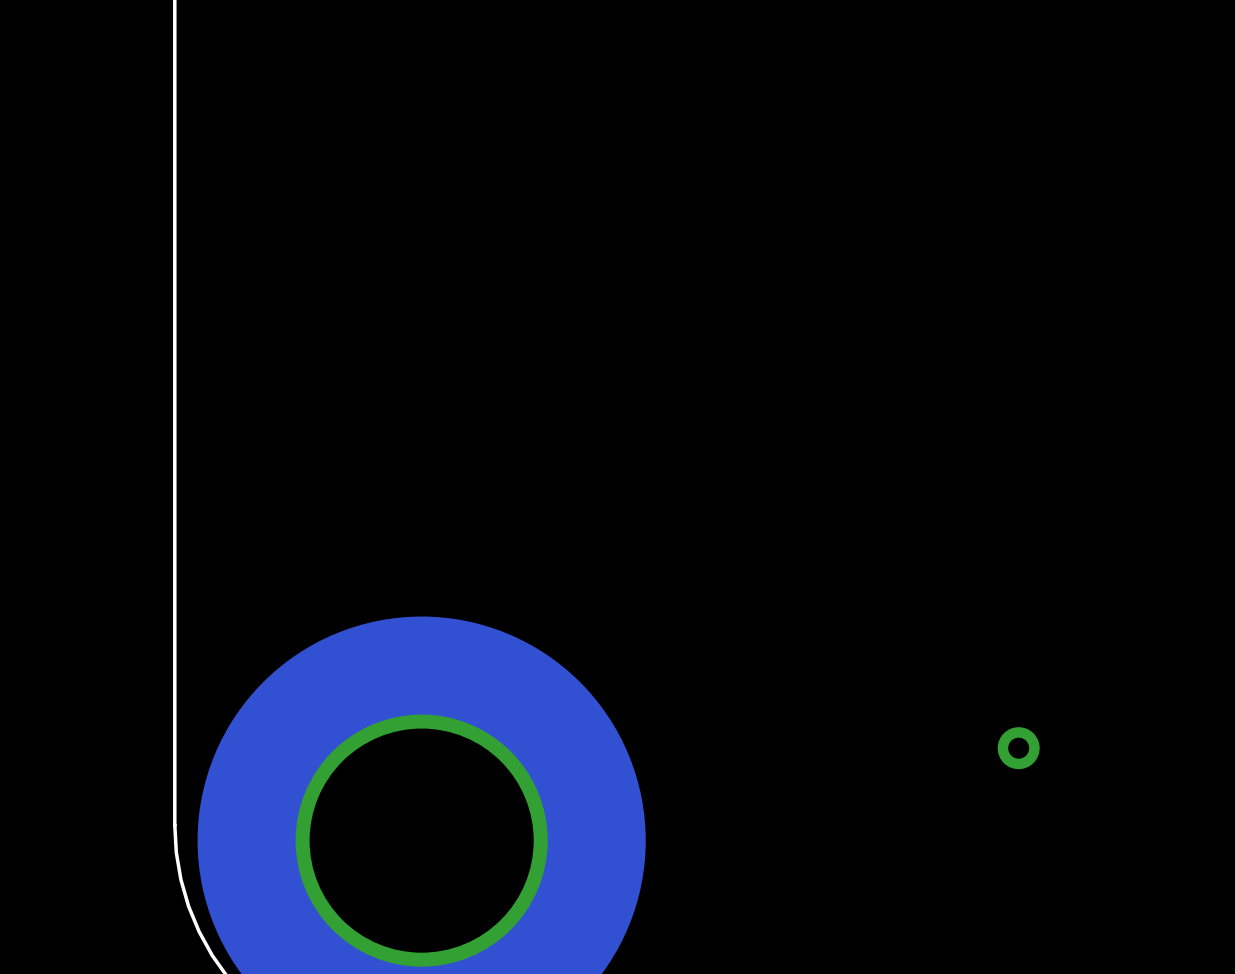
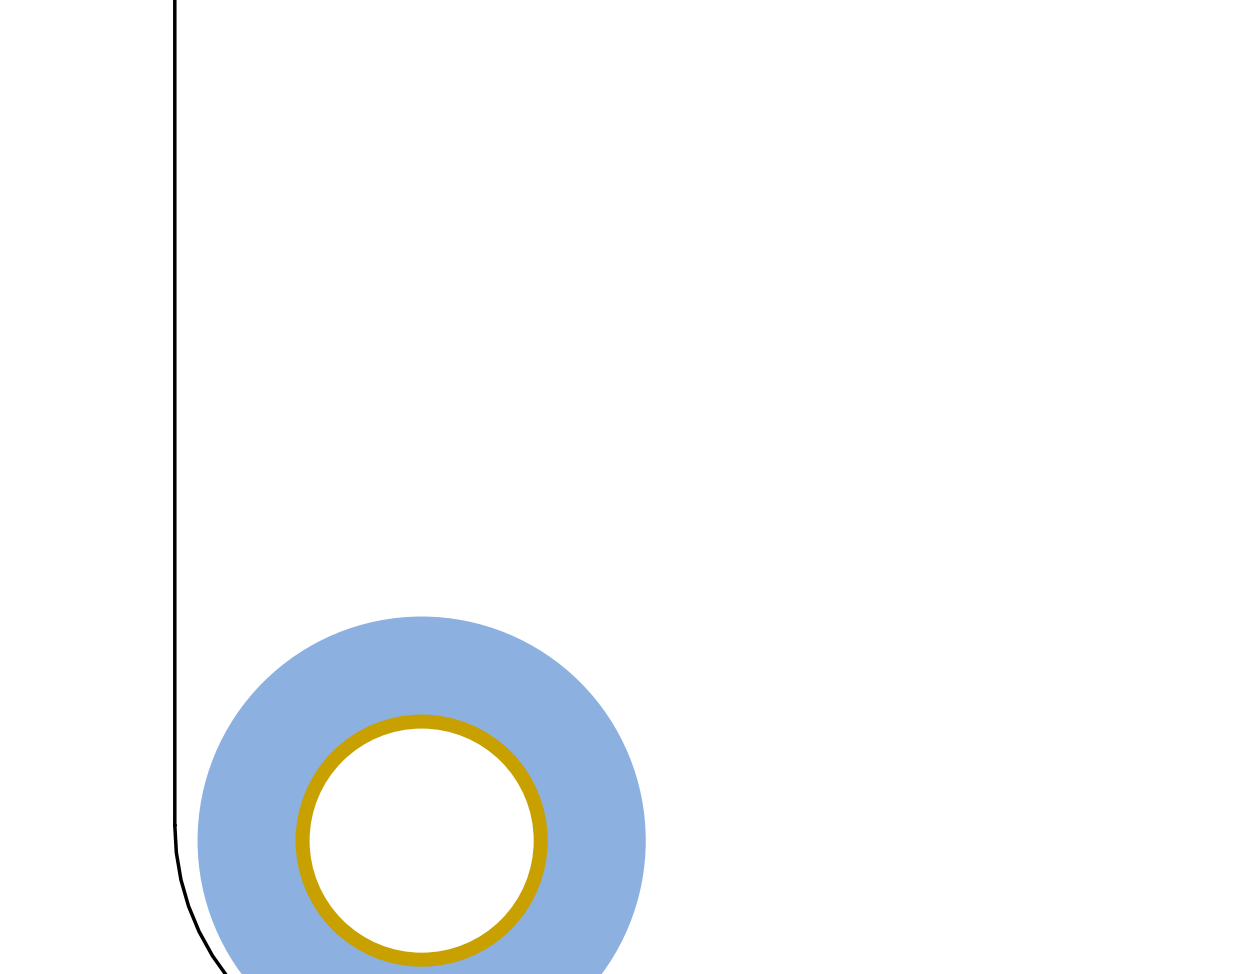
via: (1018, 748) -> none

